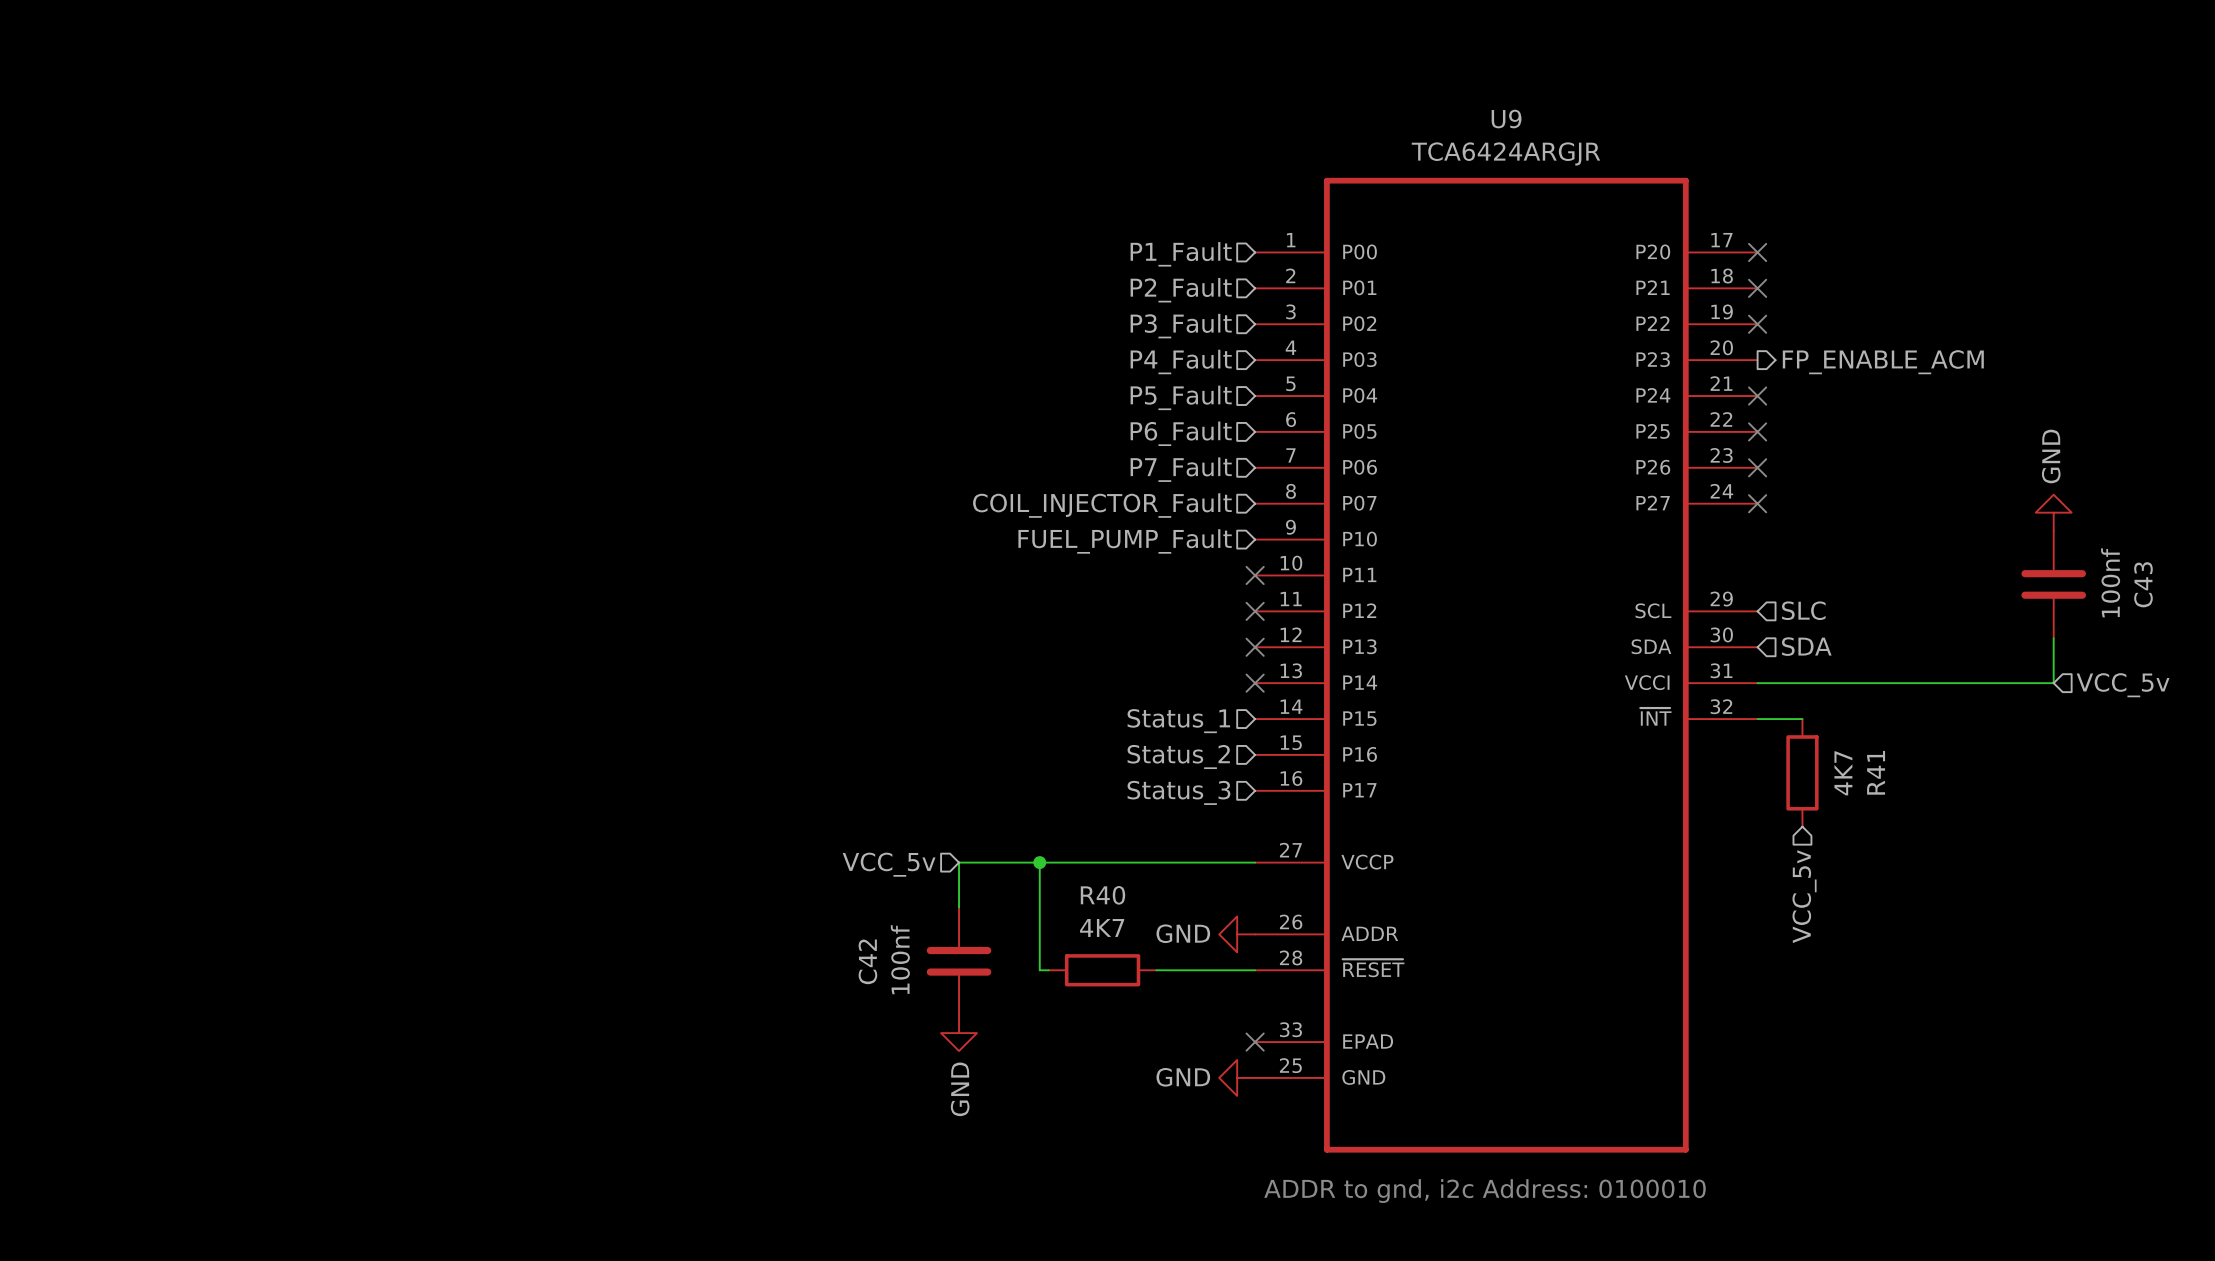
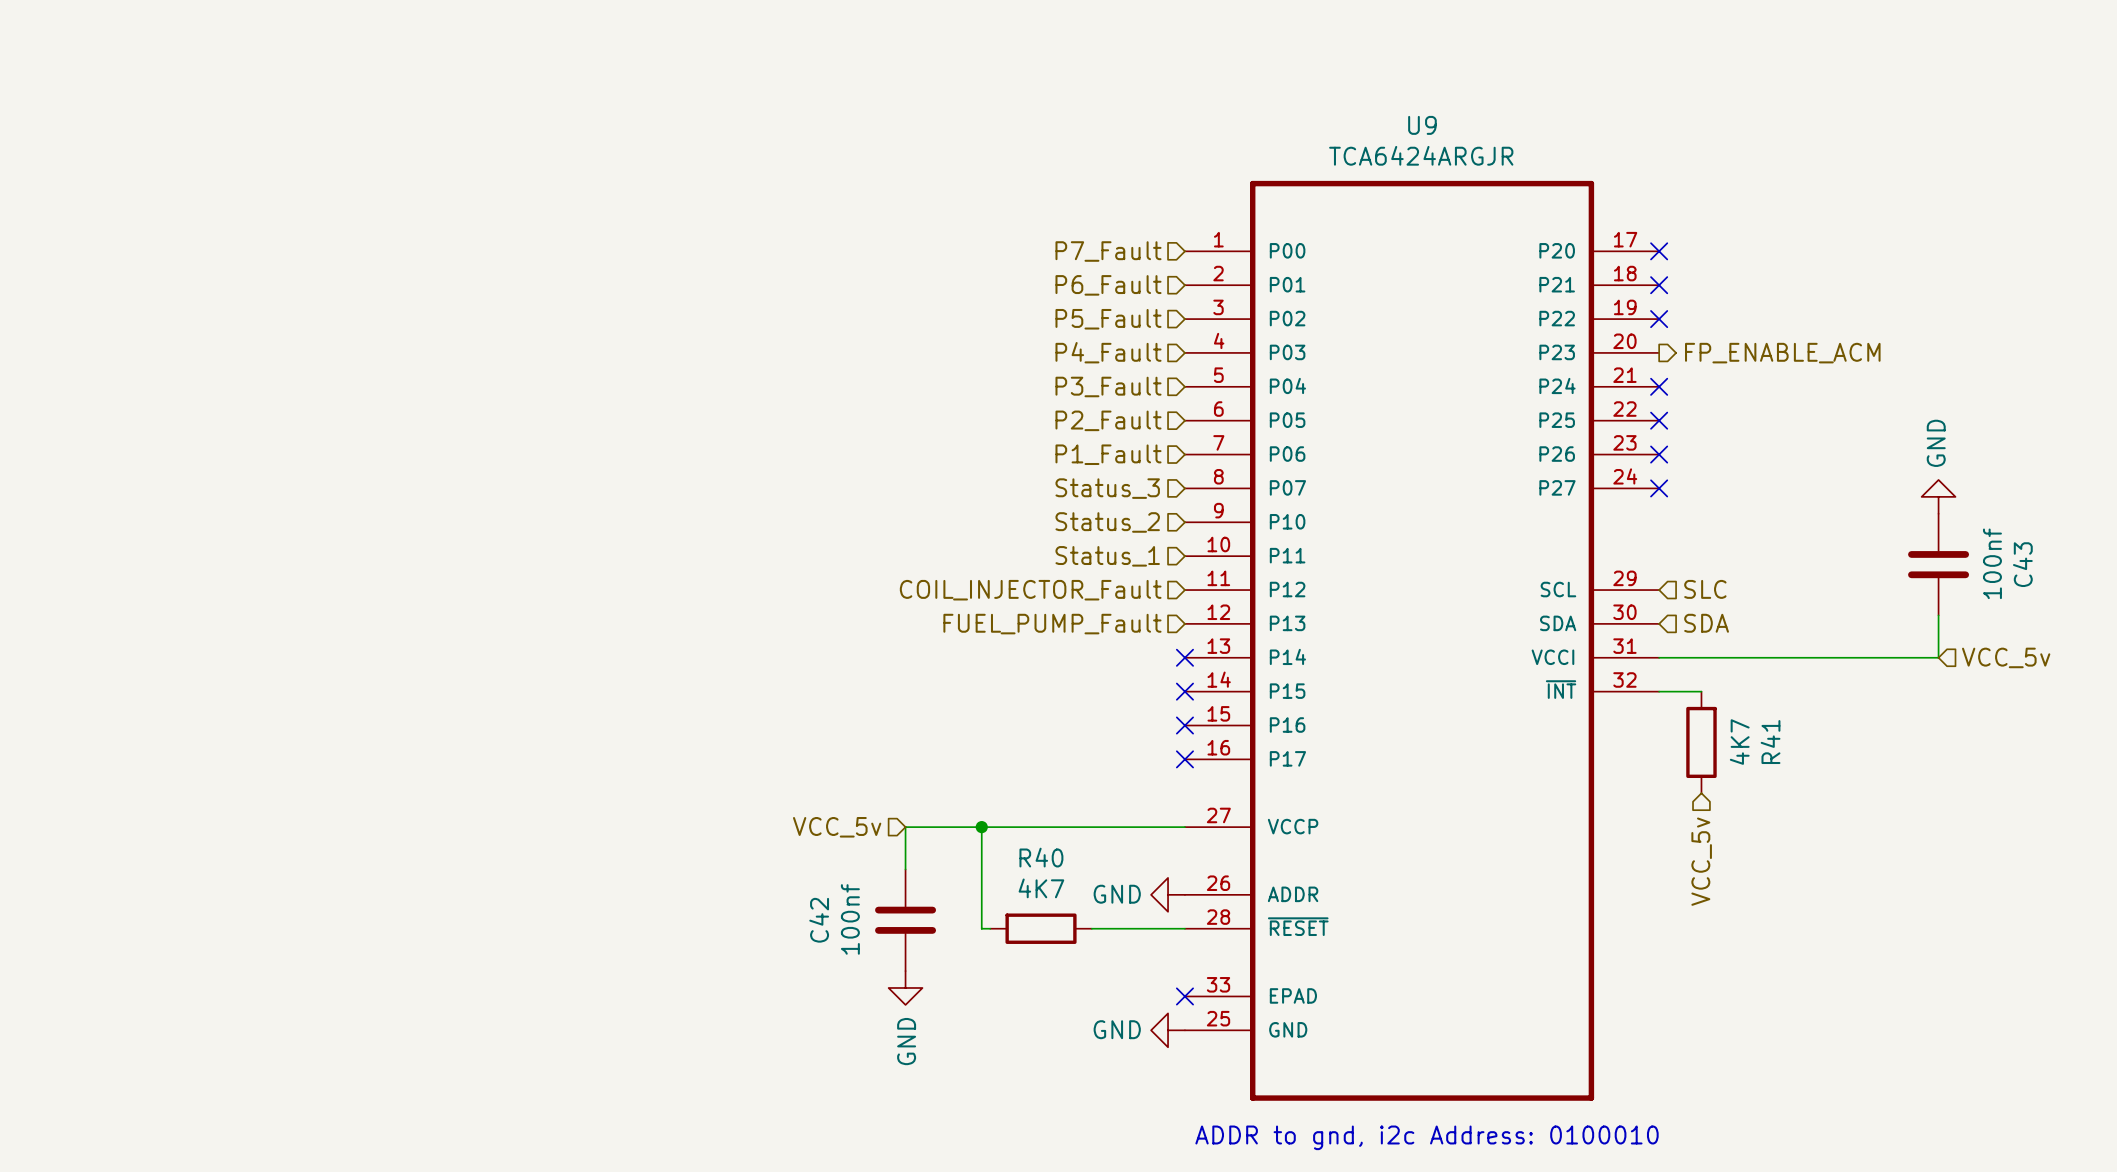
hierarchical label: P1_Fault (1181, 254) -> P7_Fault (1108, 251)
hierarchical label: P2_Fault (1181, 290) -> P6_Fault (1108, 285)
hierarchical label: P3_Fault (1181, 326) -> P5_Fault (1108, 319)
hierarchical label: P5_Fault (1181, 397) -> P3_Fault (1108, 386)
hierarchical label: P6_Fault (1181, 433) -> P2_Fault (1108, 420)
hierarchical label: P7_Fault (1181, 469) -> P1_Fault (1108, 454)
hierarchical label: COIL_INJECTOR_Fault (1102, 505) -> Status_3 (1107, 488)
hierarchical label: FUEL_PUMP_Fault (1125, 541) -> Status_2 (1107, 522)
no-connect mark: (1255, 575) -> none
no-connect mark: (1255, 611) -> none
hierarchical label: none -> COIL_INJECTOR_Fault (1030, 590)
no-connect mark: (1255, 647) -> none
hierarchical label: none -> FUEL_PUMP_Fault (1052, 624)
no-connect mark: none -> (1184, 691)
hierarchical label position: Status_1 (1178, 721) -> Status_1 (1107, 556)
no-connect mark: none -> (1184, 725)
hierarchical label: Status_2 (1178, 757) -> none
no-connect mark: none -> (1184, 759)
hierarchical label: Status_3 (1178, 792) -> none

